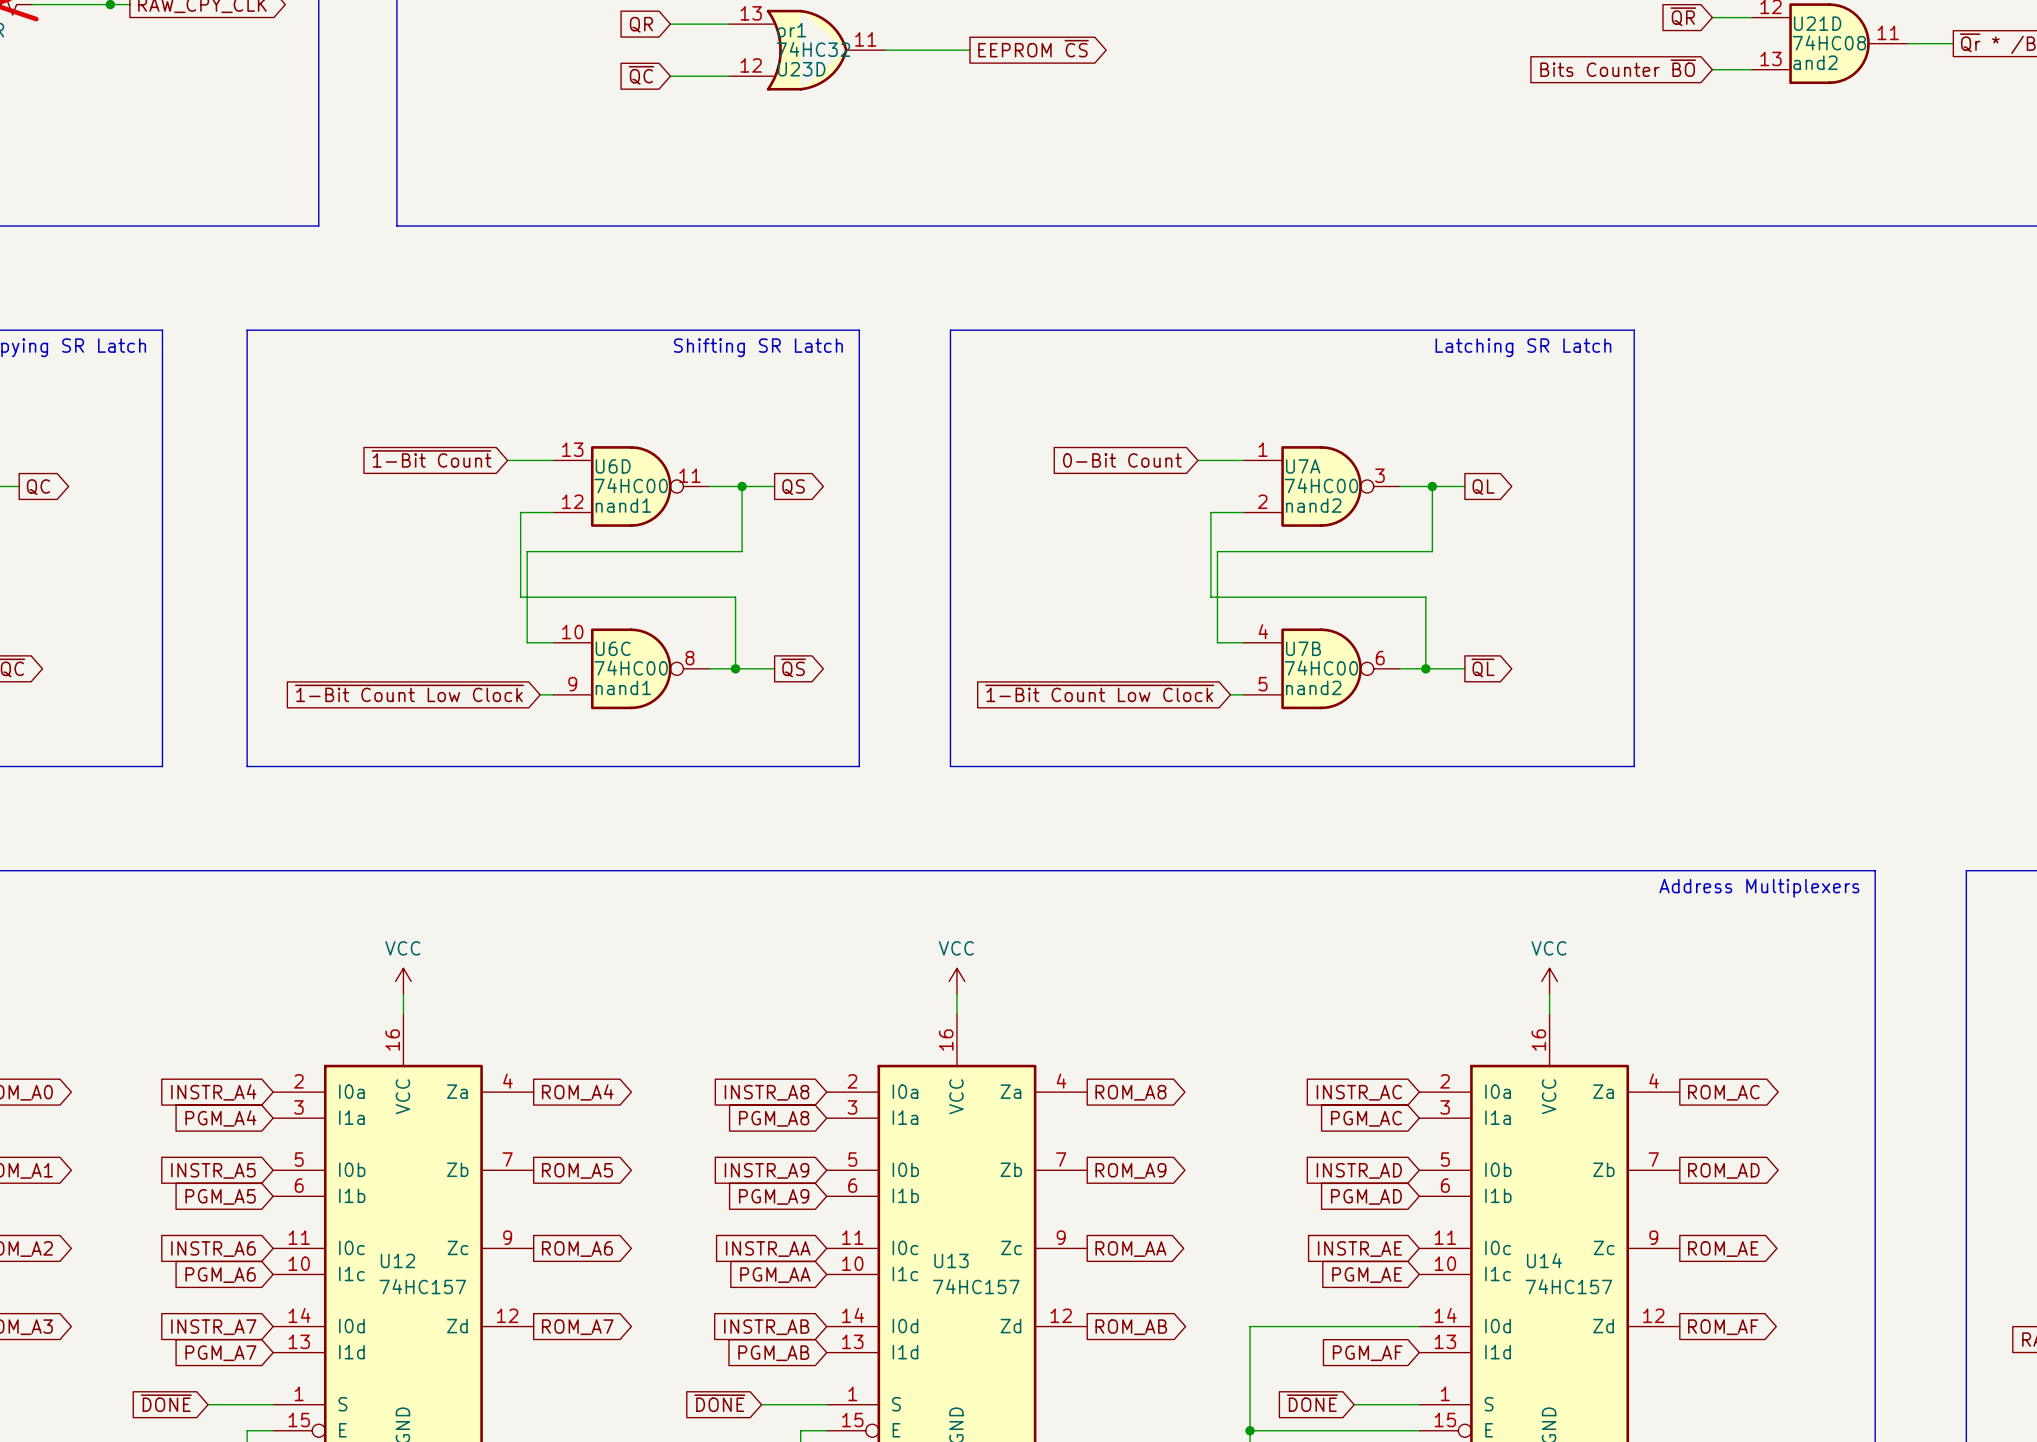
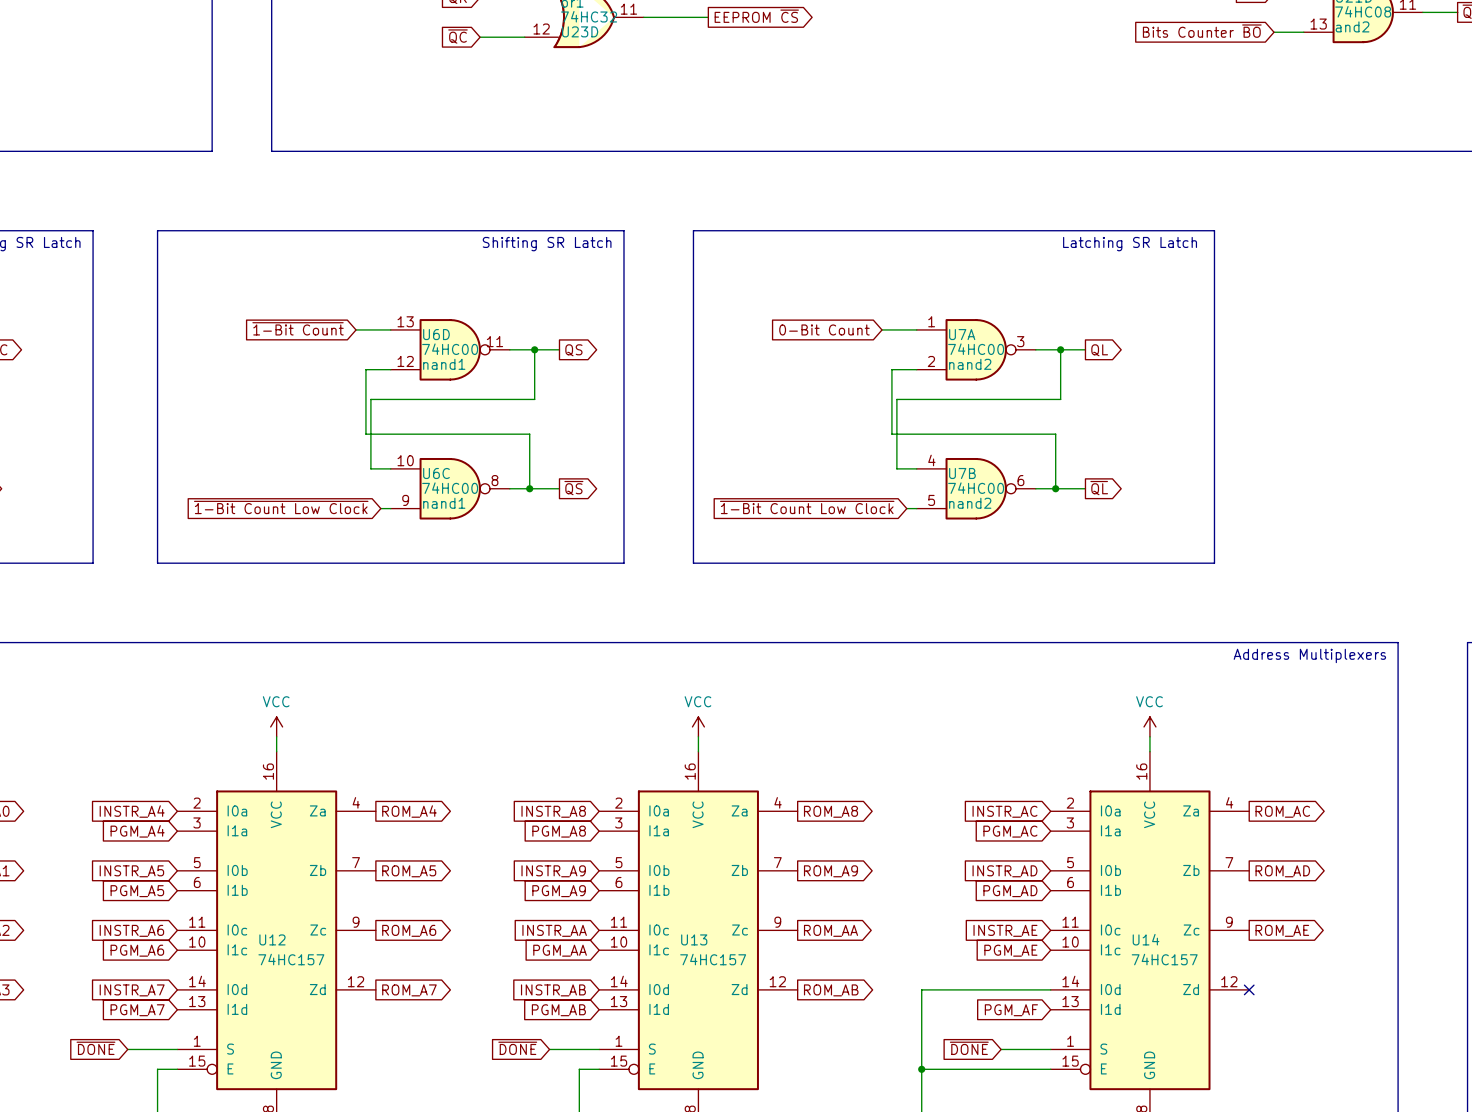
no-connect mark: none -> (1249, 989)
global label: ROM_AF (1723, 1327) -> none

